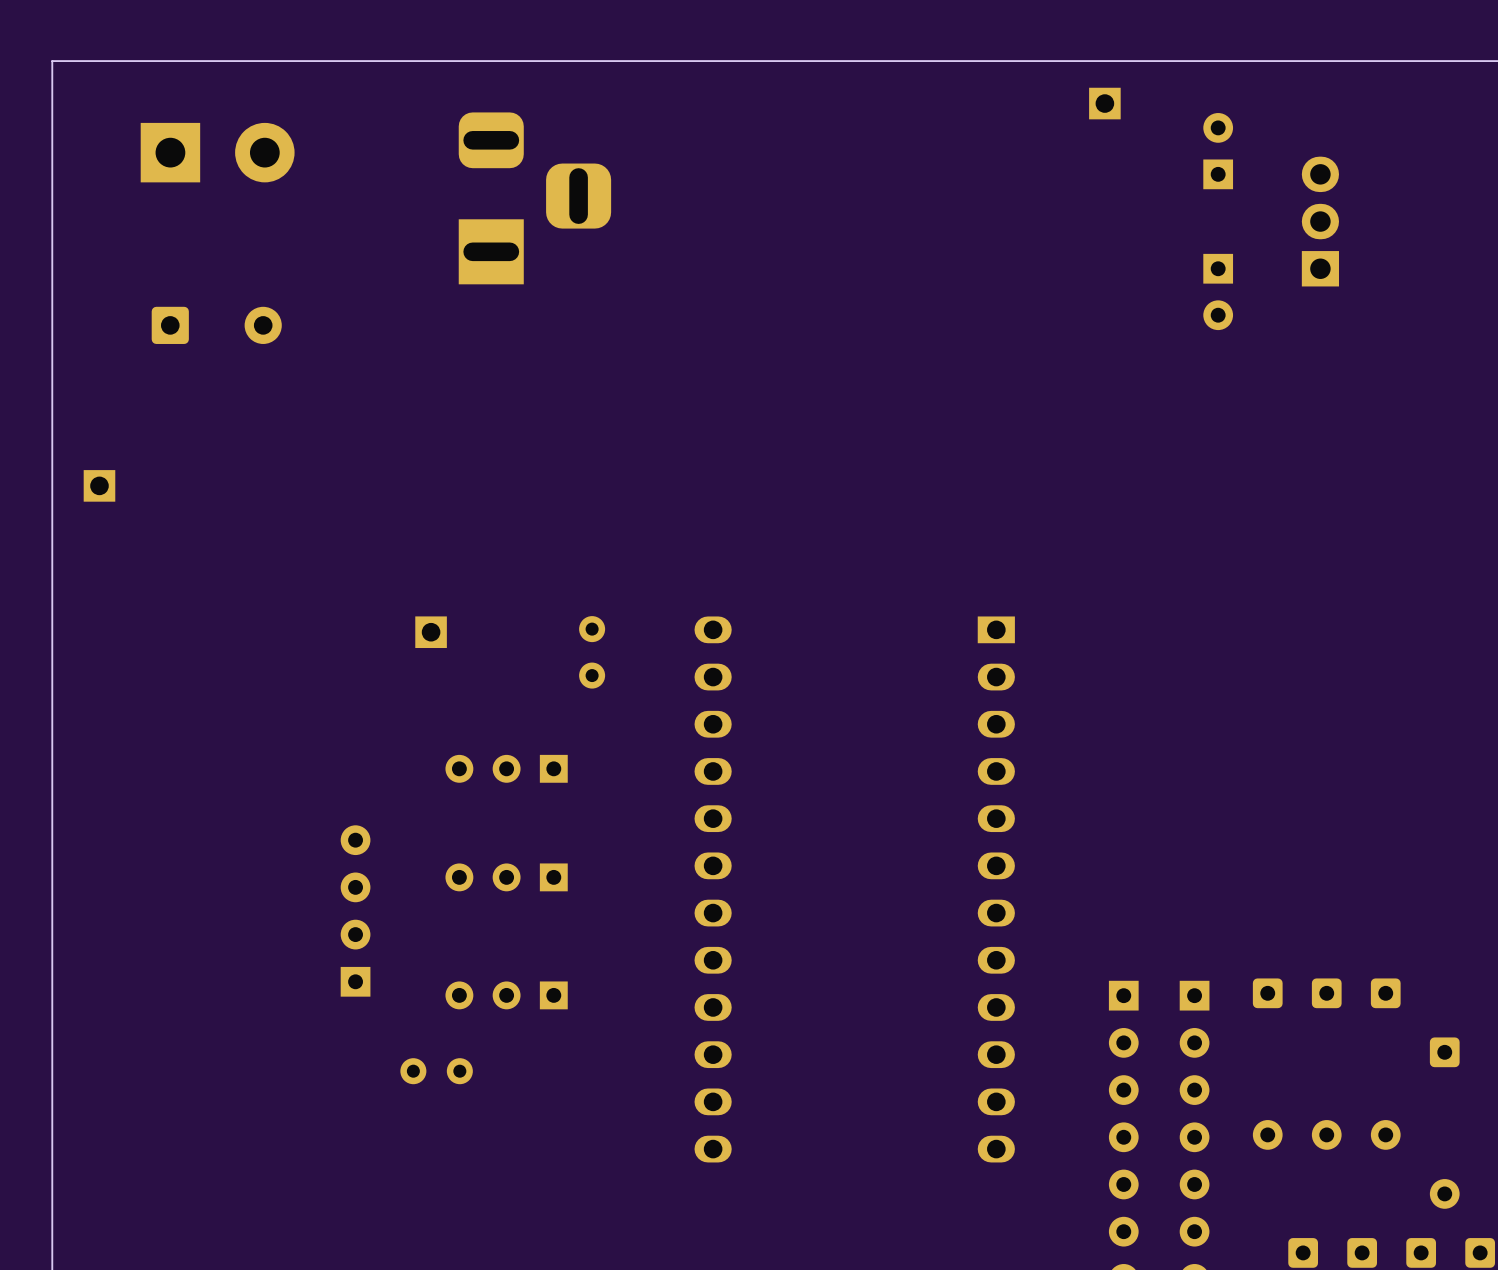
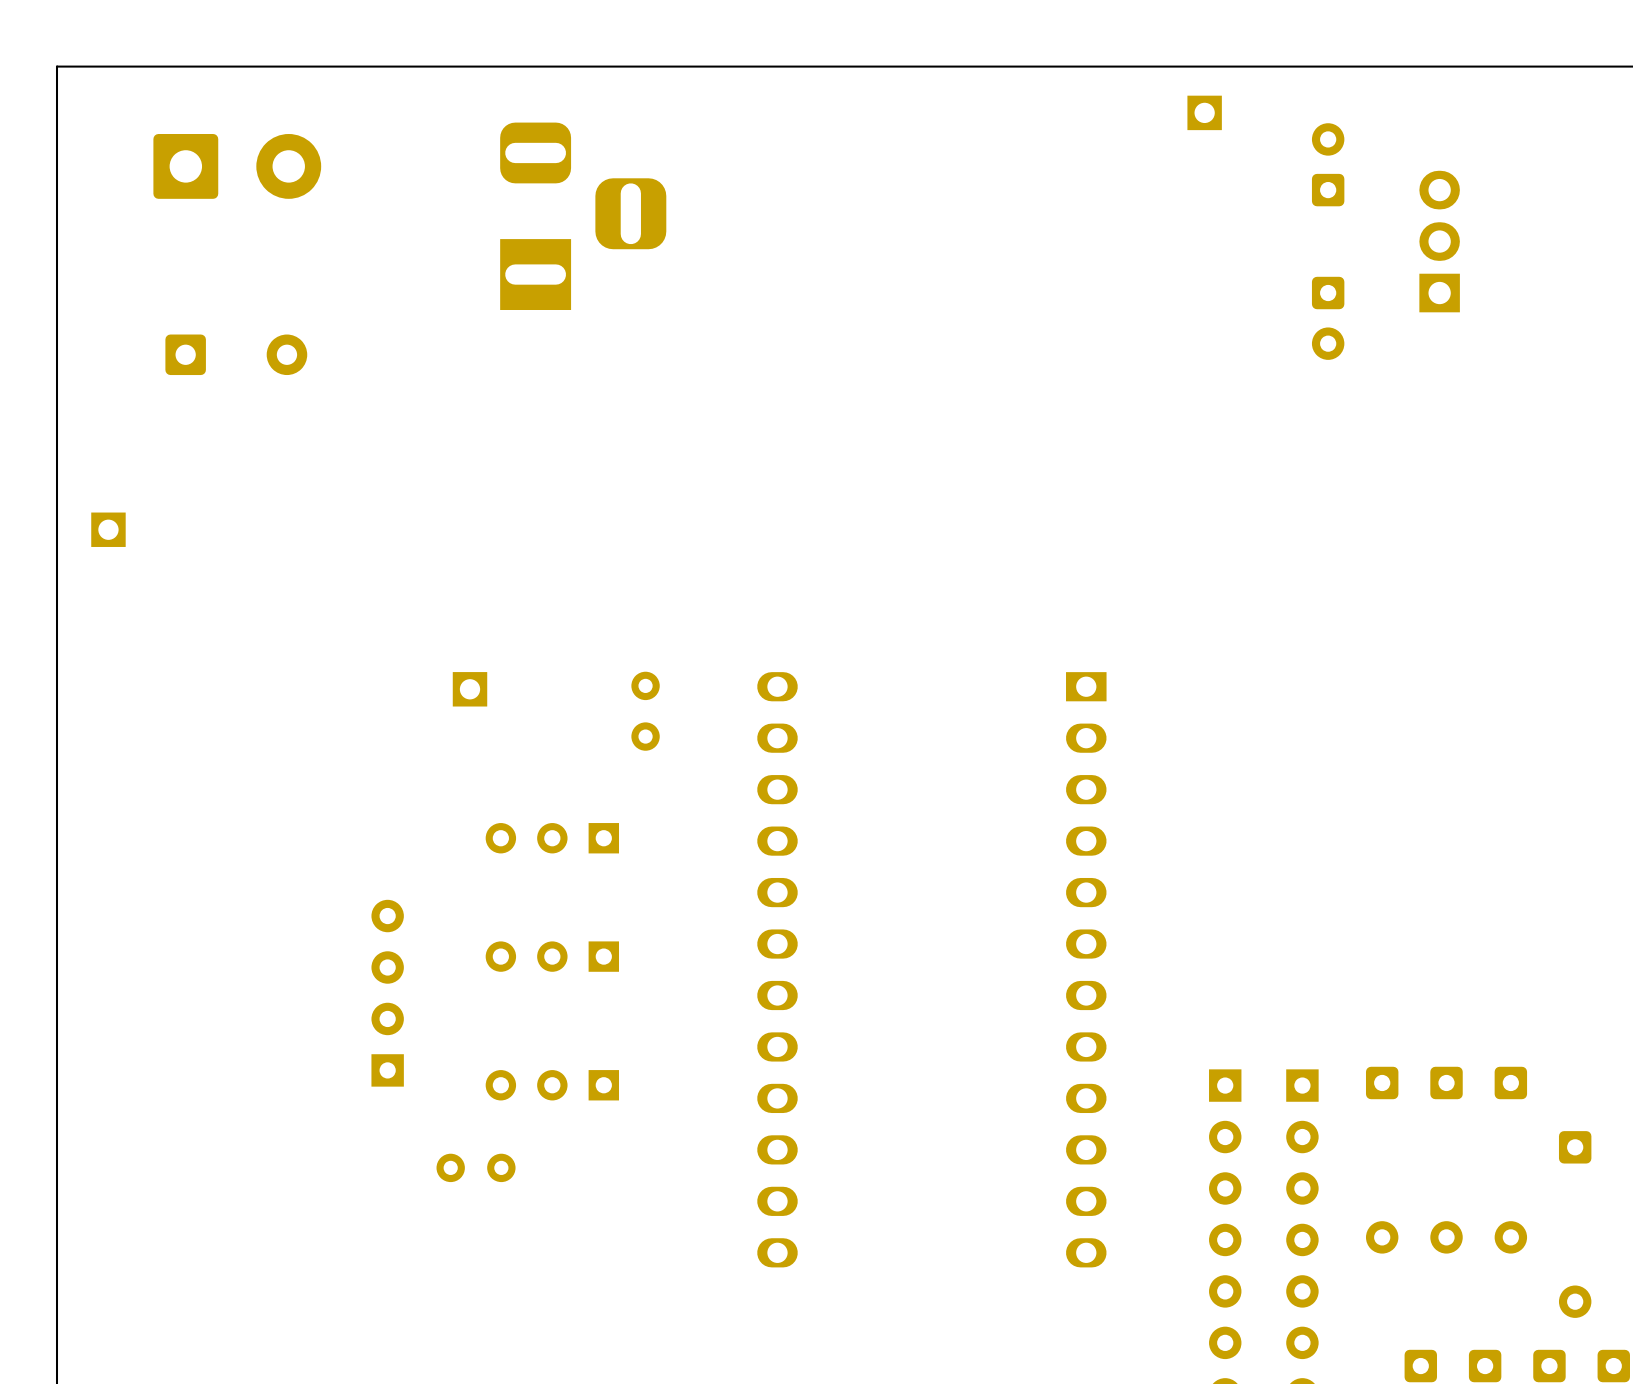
part footprint: [1203, 113, 1234, 190] -> [1311, 123, 1345, 207]
part footprint: [140, 122, 295, 183] -> [153, 134, 322, 199]
part footprint: [1203, 253, 1234, 331] -> [1311, 276, 1345, 360]

